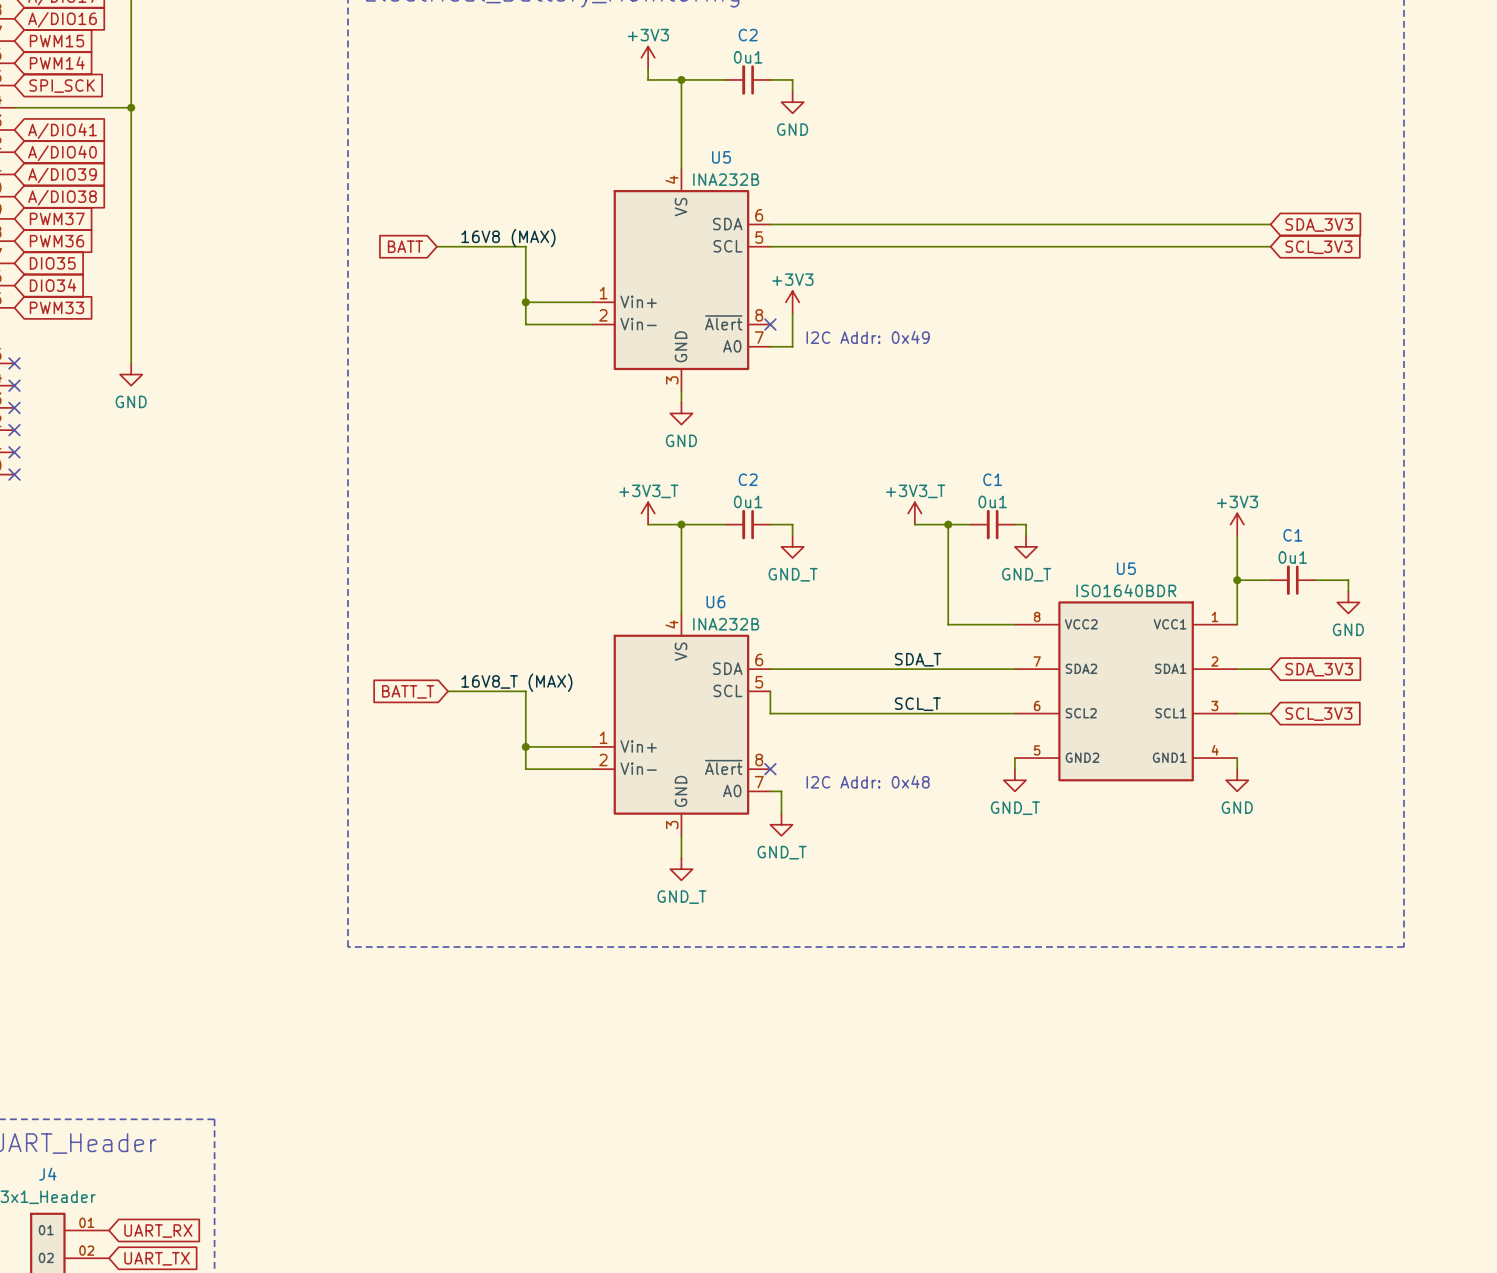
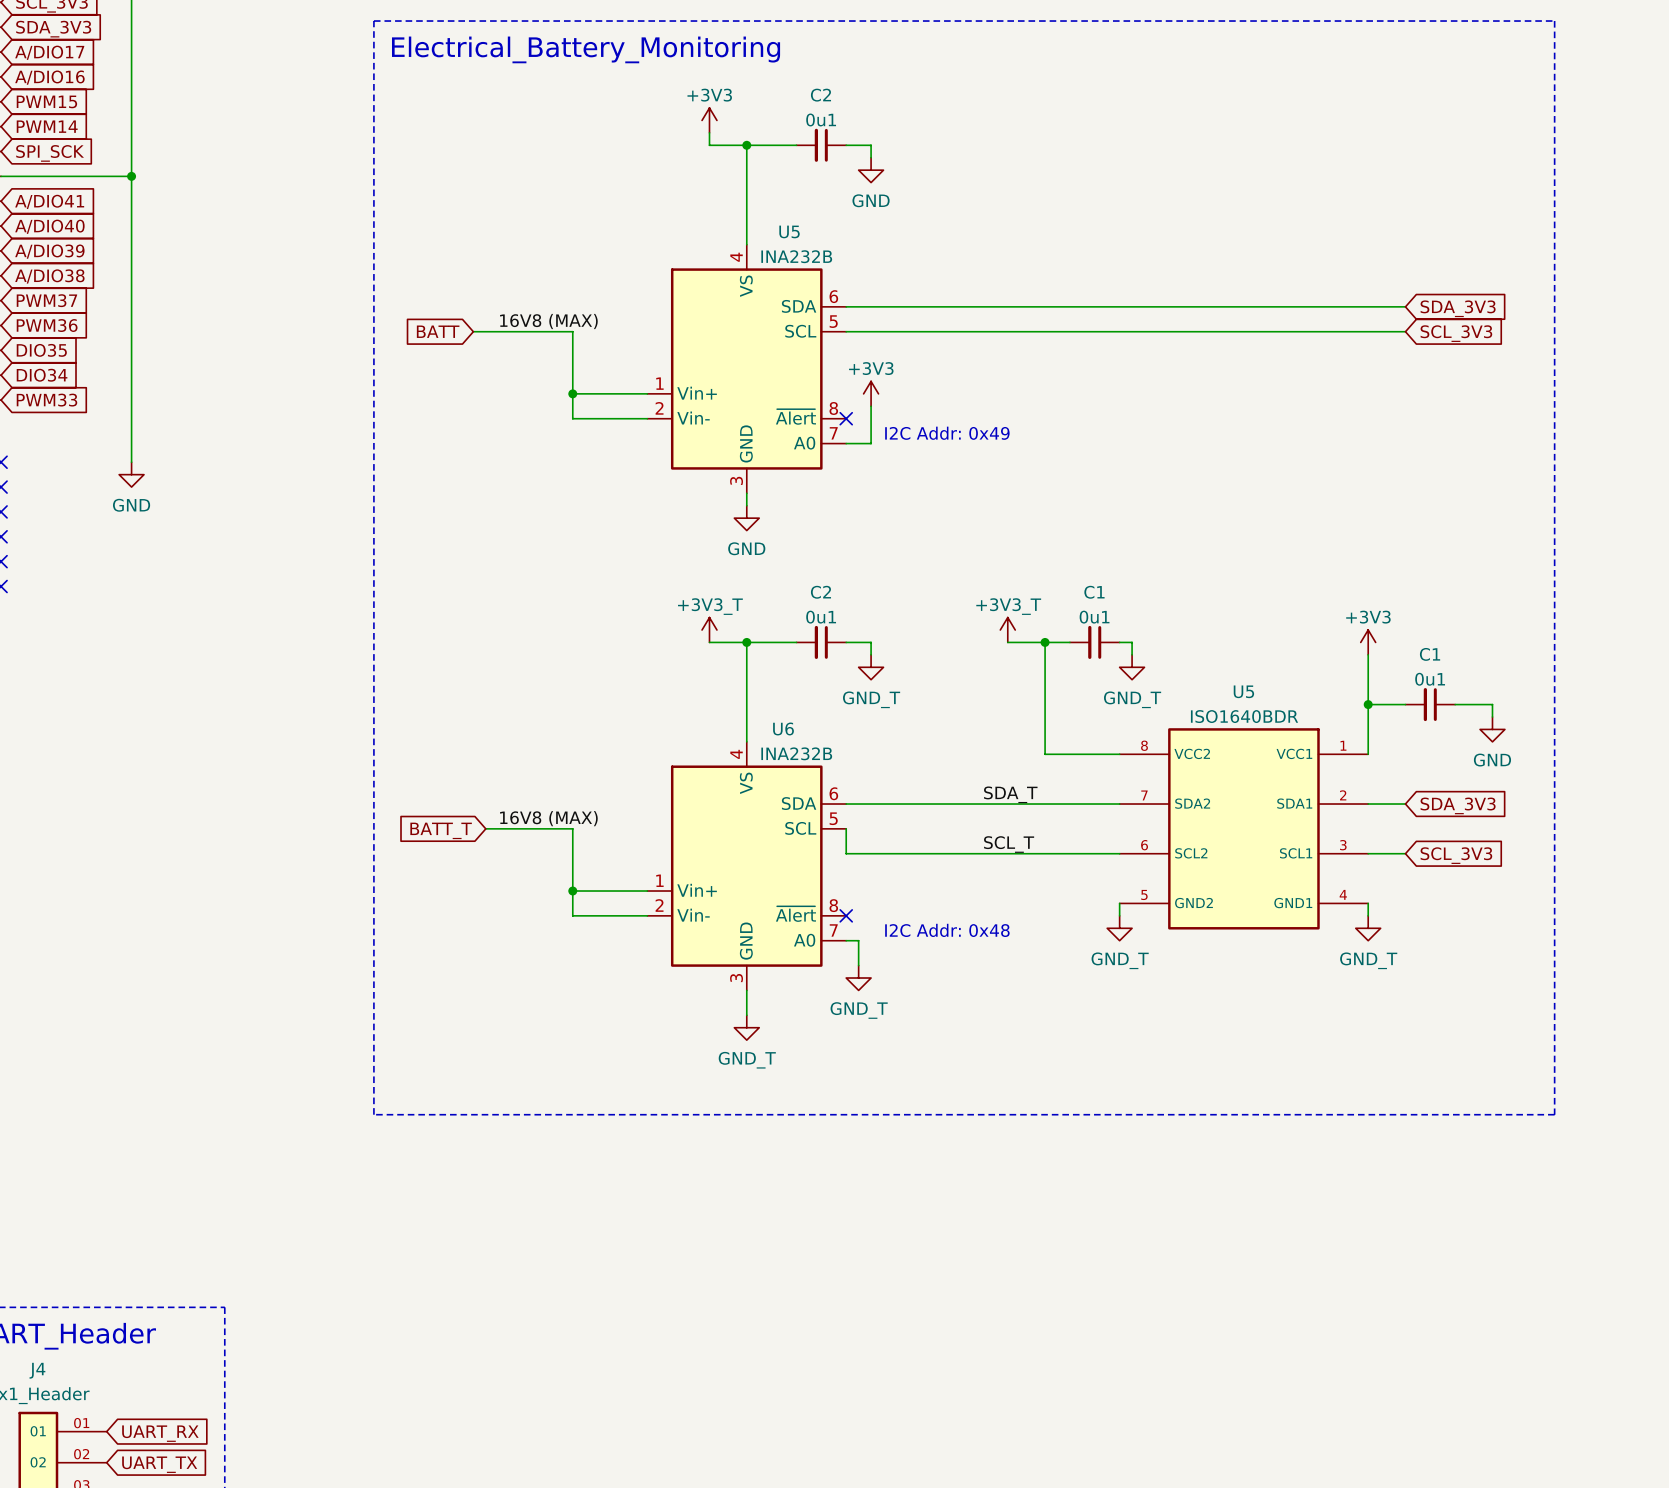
label: 16V8_T (MAX) (516, 682) -> 16V8 (MAX) (548, 818)
power symbol: GND (1237, 780) -> GND_T (1368, 928)

